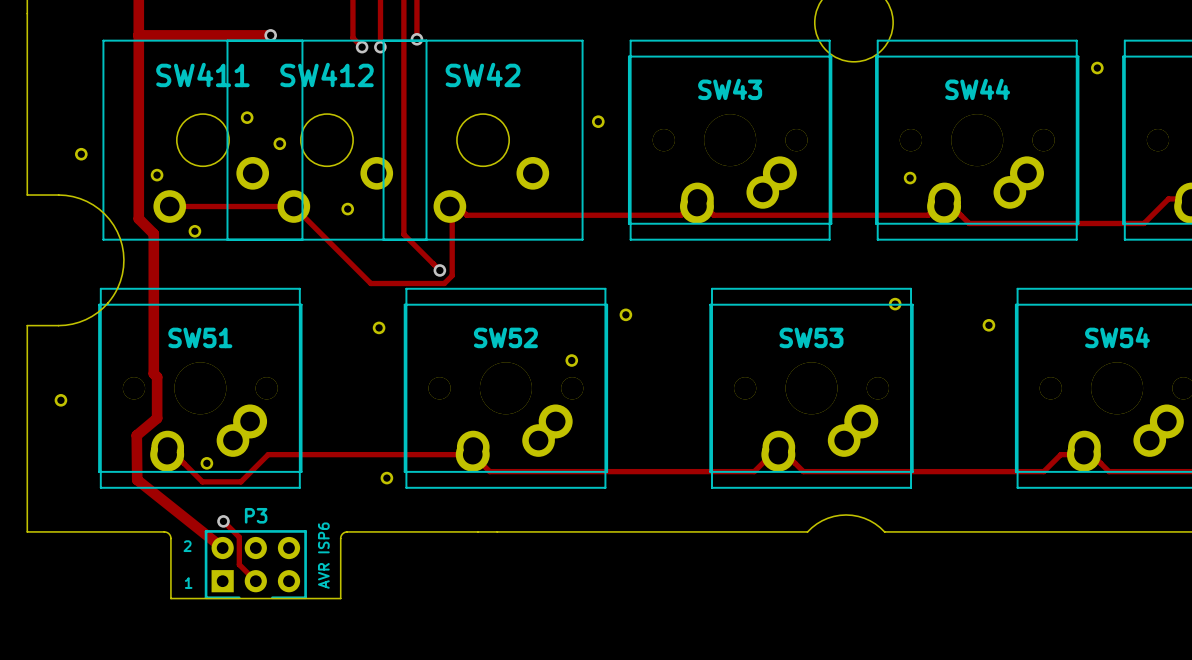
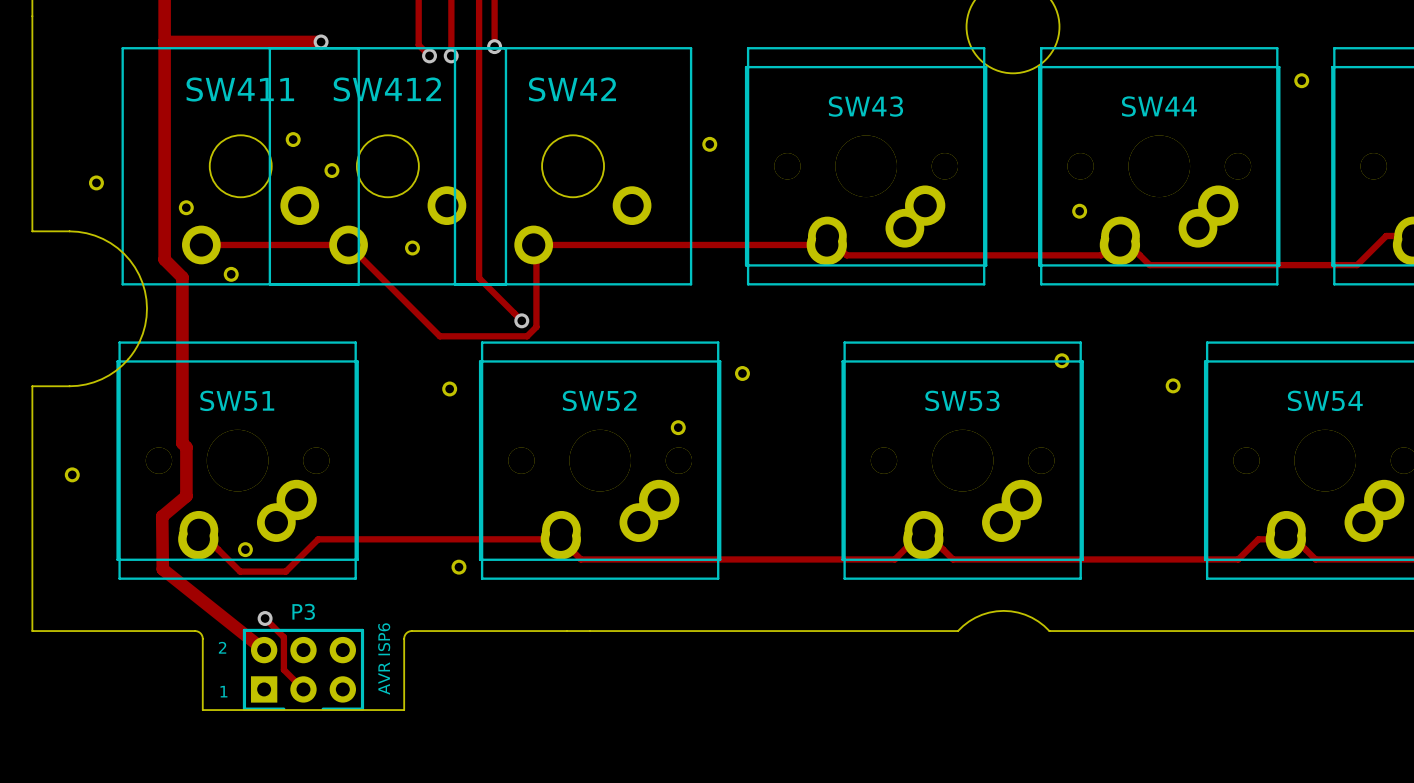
track: (450, 198) (466, 215) (681, 215) (697, 198) -> none
track: none -> (533, 244) (826, 244)

